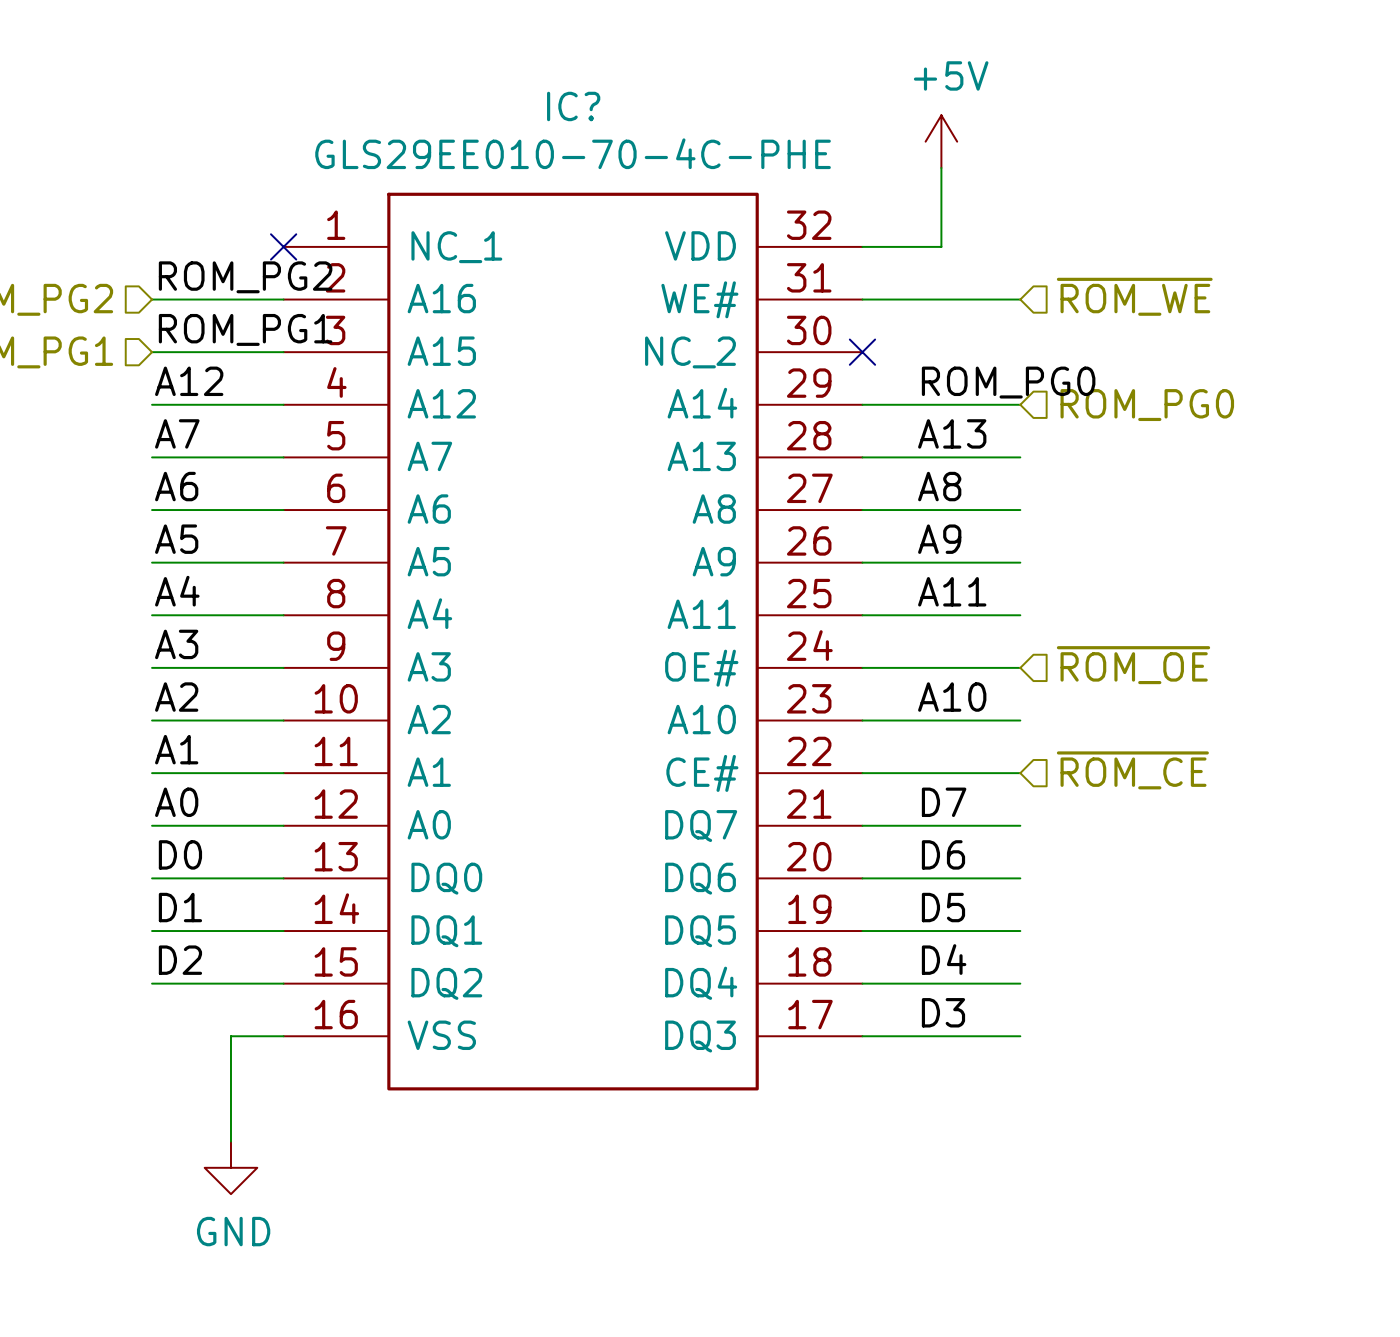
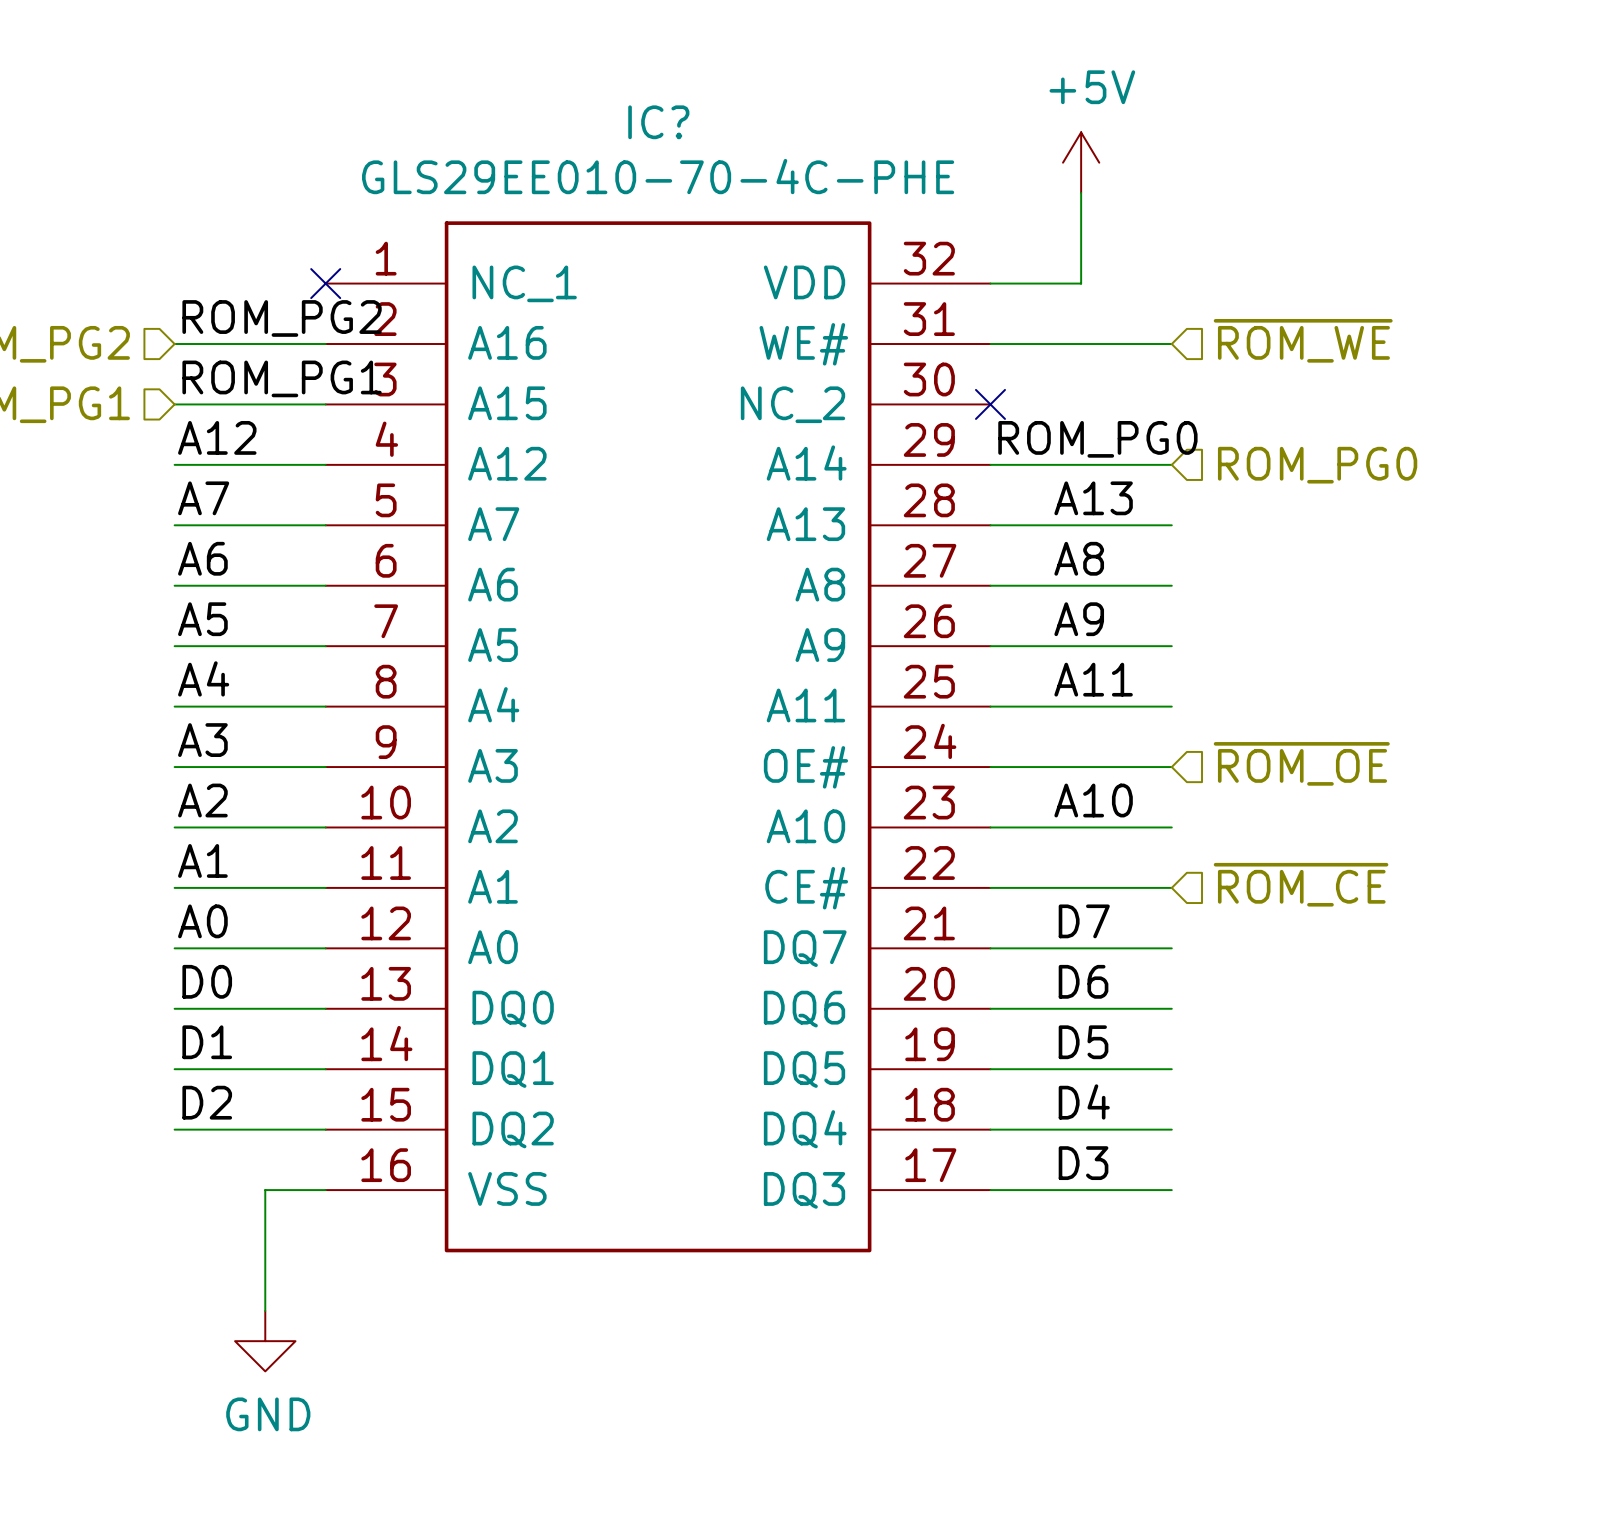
label position: ROM_PG0 (1008, 382) -> ROM_PG0 (1097, 439)

